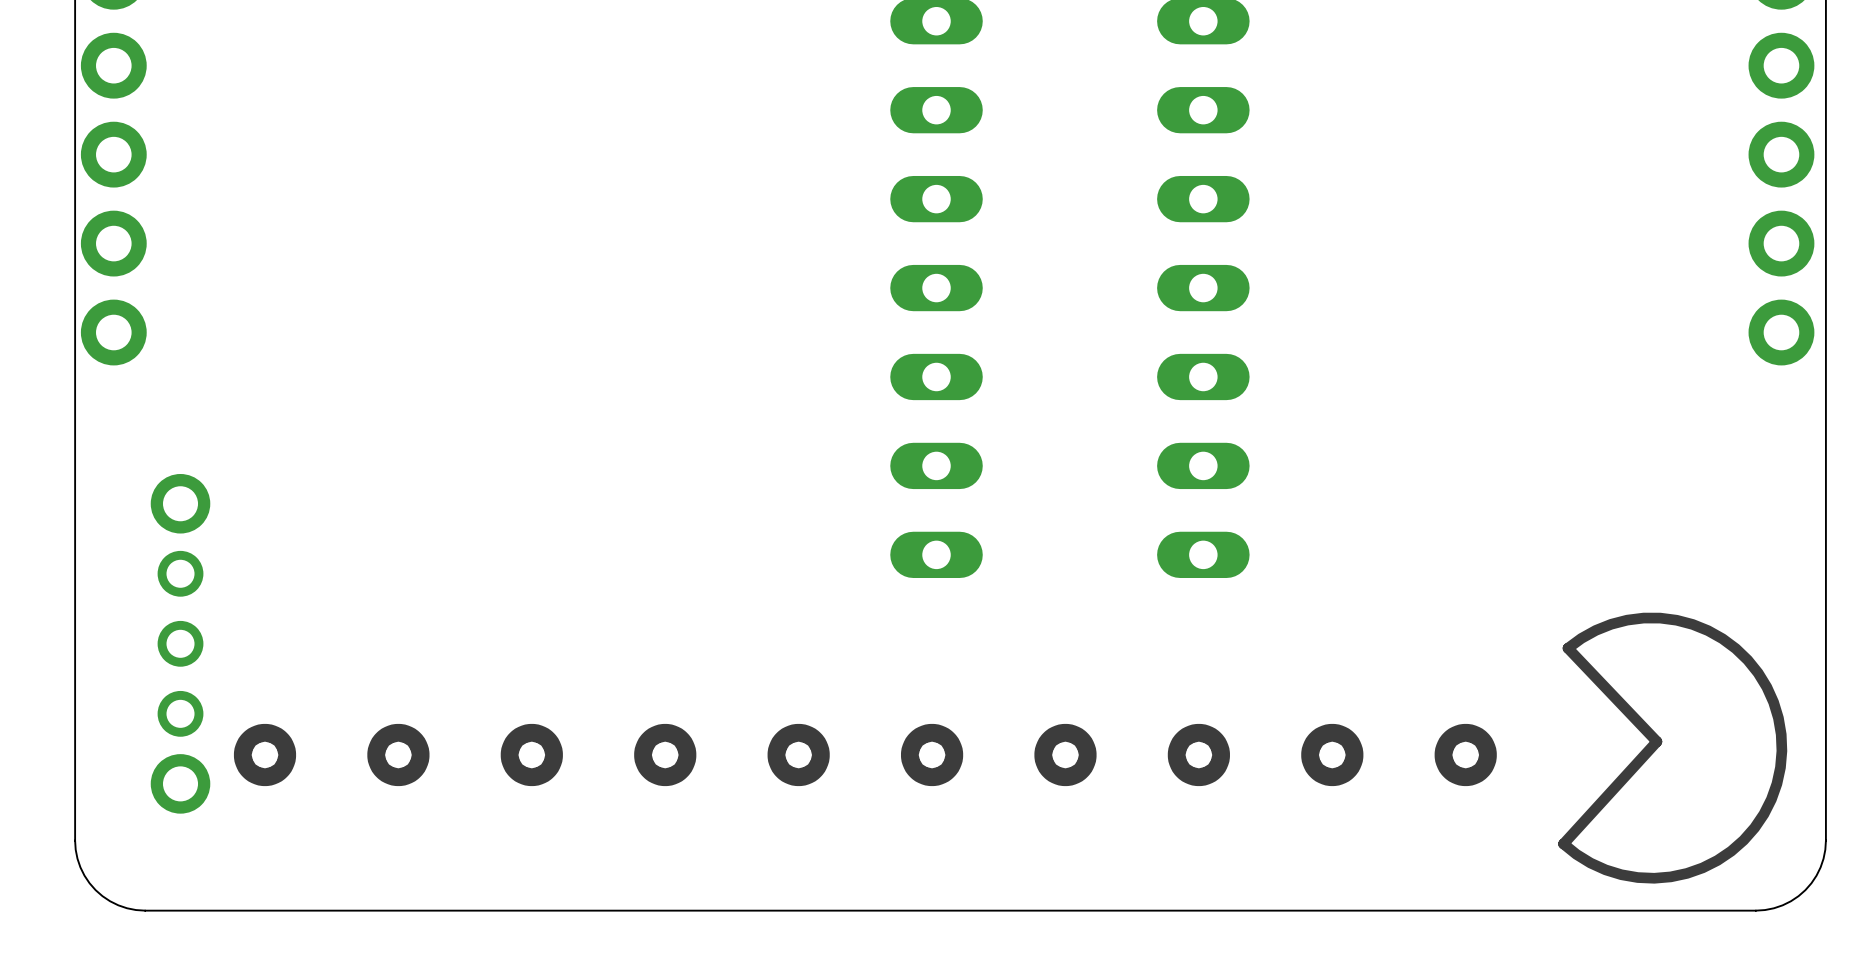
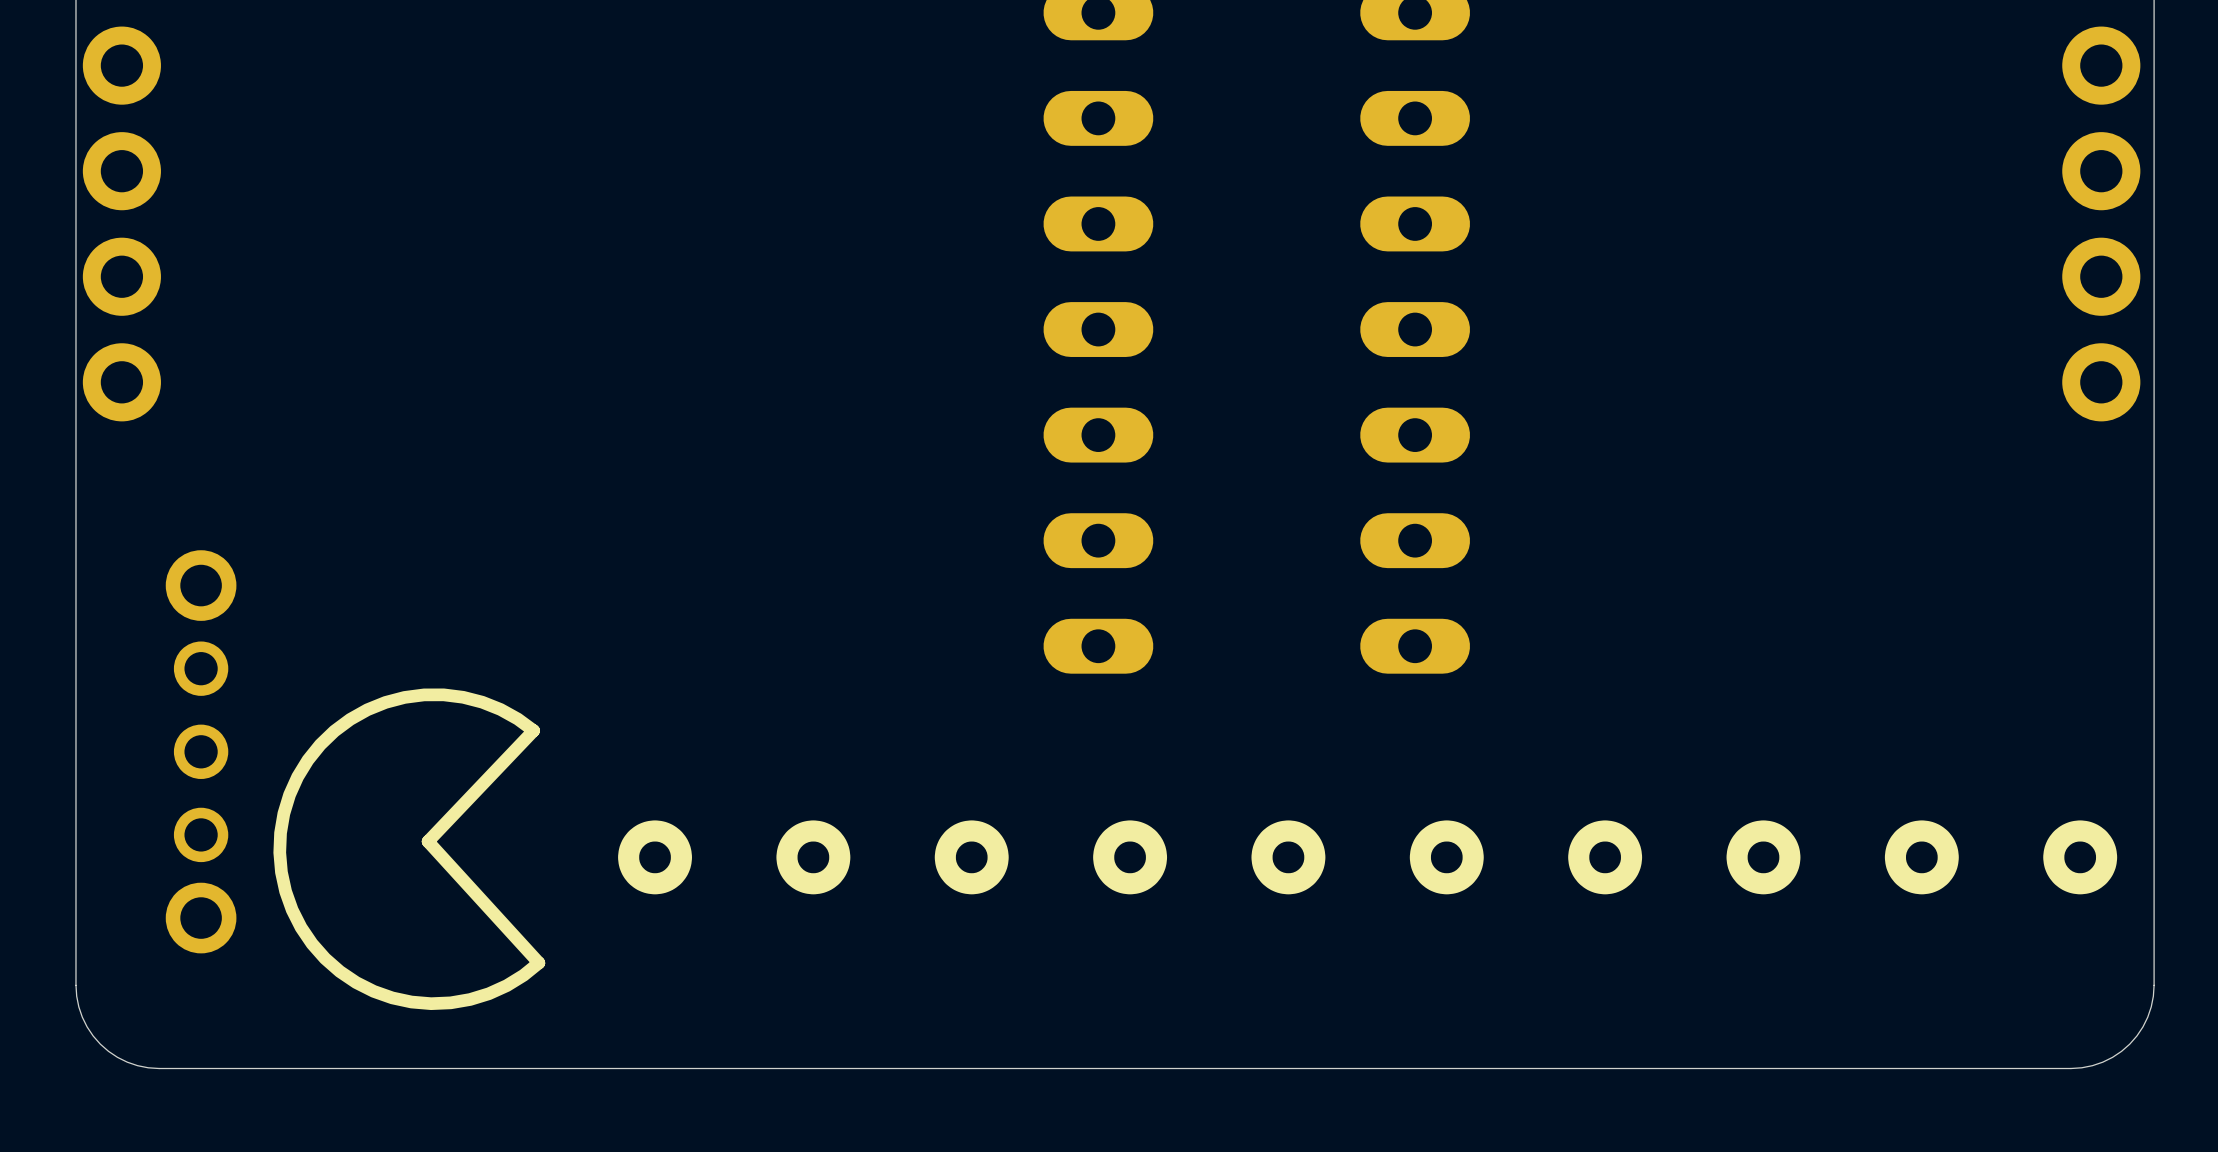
line: none -> (533, 730) (428, 841) (538, 962) (506, 985) (488, 993) (450, 1002) (431, 1003) (392, 997) (373, 991) (339, 971) (325, 958) (301, 927) (285, 891) (281, 872) (280, 832) (289, 794) (297, 776) (320, 744) (334, 731) (367, 709) (385, 702) (424, 694) (463, 697) (482, 702) (517, 719) (533, 730)
line: (1568, 648) (1656, 741) (1563, 843) (1590, 863) (1605, 869) (1637, 877) (1654, 878) (1687, 873) (1702, 867) (1731, 851) (1743, 840) (1763, 814) (1776, 783) (1780, 767) (1781, 734) (1773, 702) (1766, 687) (1747, 660) (1735, 648) (1708, 630) (1692, 624) (1660, 618) (1627, 620) (1611, 624) (1581, 638) (1568, 648) -> none
drawing: none -> [1884, 820, 1959, 895]
drawing: none -> [2043, 820, 2118, 895]
drawing: [233, 723, 297, 787] -> none
drawing: [367, 723, 430, 787] -> none
drawing position: (531, 754) -> (655, 857)
drawing position: (665, 754) -> (813, 857)
drawing position: (798, 754) -> (971, 857)
drawing position: (932, 754) -> (1130, 857)
drawing position: (1065, 754) -> (1288, 857)
drawing position: (1198, 754) -> (1446, 857)
drawing position: (1332, 754) -> (1605, 857)
drawing position: (1465, 754) -> (1763, 857)

